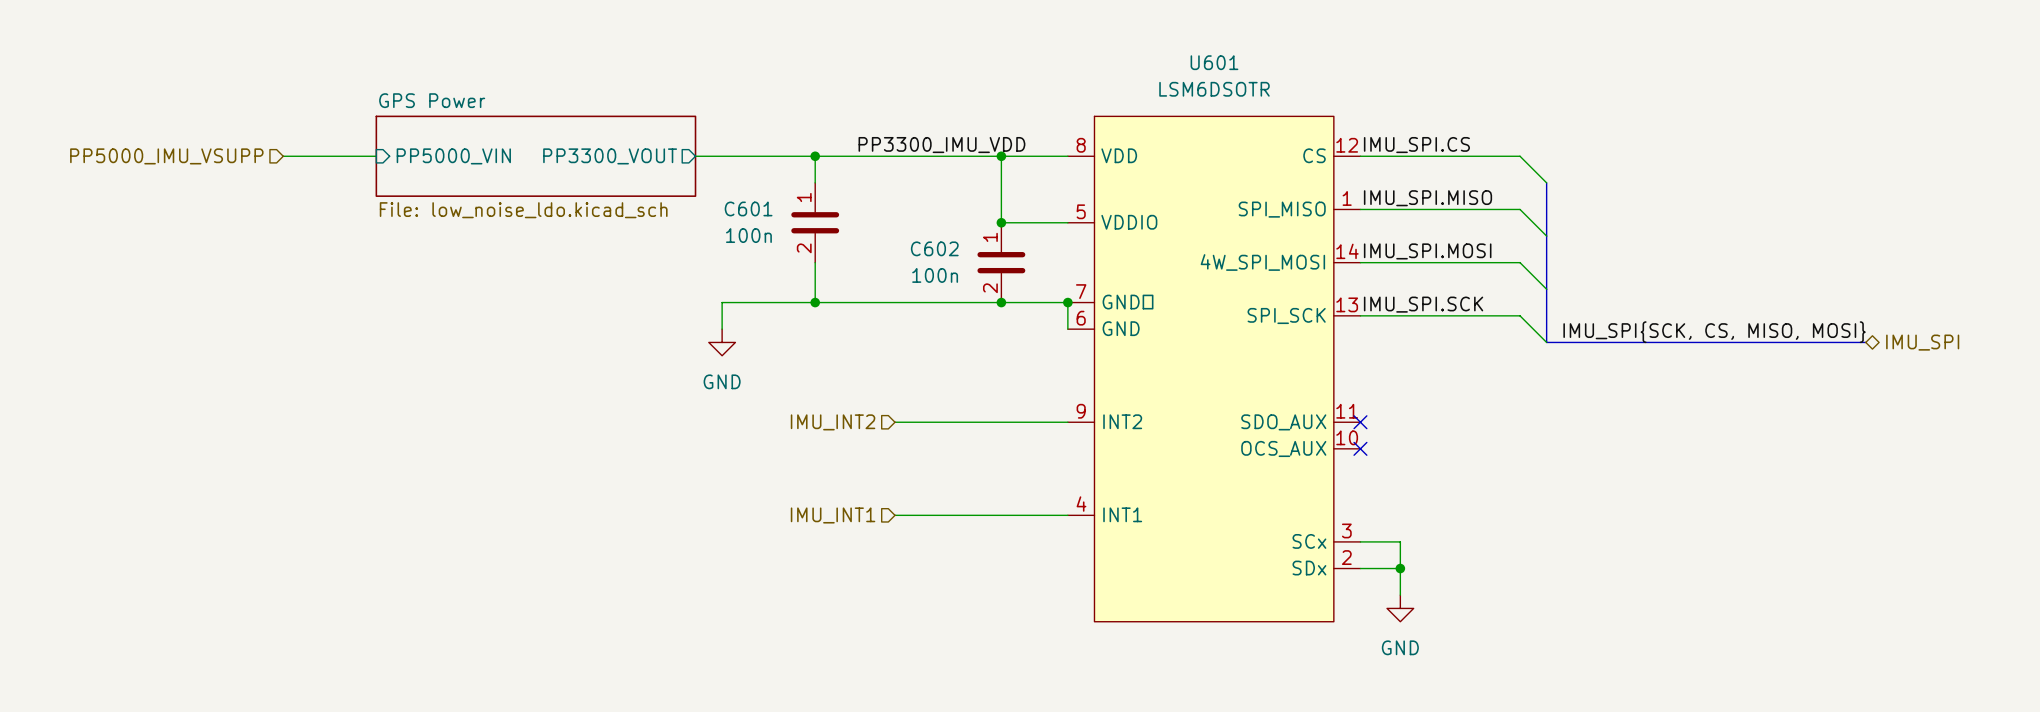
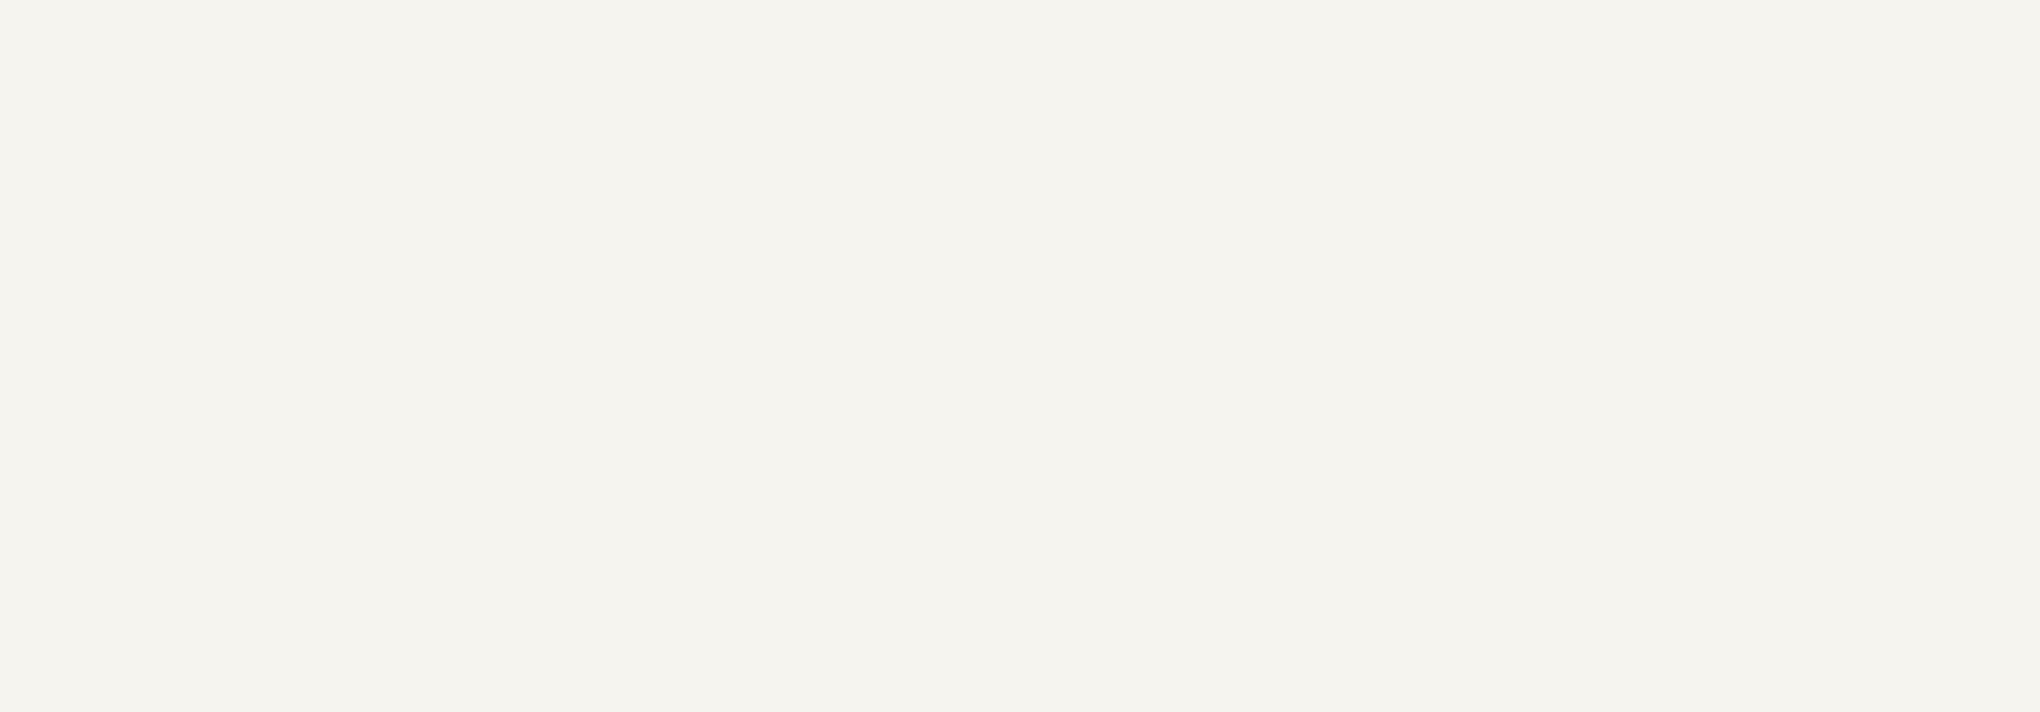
label: PP3300_IMU_VDD (941, 145) -> none
label: IMU_SPI.CS (1416, 145) -> none
hierarchical label: PP5000_IMU_VSUPP (166, 156) -> none
wire: (283, 156) (376, 156) -> none
sheet pin: PP5000_VIN (453, 156) -> none
sheet GPS Power: File: low_noise_ldo.kicad_sch (535, 156) -> none
sheet pin: PP3300_VOUT (610, 156) -> none
wire: (695, 156) (1067, 156) -> none
wire: (815, 156) (815, 182) -> none
junction: (815, 156) -> none
wire: (1001, 156) (1001, 222) (1067, 222) -> none
junction: (1001, 156) -> none
wire: (1360, 156) (1520, 156) (1546, 182) -> none
bus: (1546, 182) (1546, 342) (1865, 342) -> none
label: IMU_SPI.MISO (1427, 198) -> none
wire: (1360, 209) (1520, 209) (1546, 236) -> none
C601: 100n (815, 222) -> none
junction: (1001, 222) -> none
label: IMU_SPI.MOSI (1427, 251) -> none
wire: (815, 262) (815, 302) -> none
C602: 100n (1001, 262) -> none
wire: (1360, 262) (1520, 262) (1546, 289) -> none
junction: (815, 302) -> none
junction: (1001, 302) -> none
junction: (1067, 302) -> none
label: IMU_SPI.SCK (1423, 304) -> none
wire: (1360, 315) (1520, 315) (1546, 342) -> none
wire: (722, 329) (722, 302) (1067, 302) (1067, 329) -> none
label: IMU_SPI{SCK, CS, MISO, MOSI} (1714, 332) -> none
power symbol: GND (722, 342) -> none
hierarchical label: IMU_SPI (1922, 342) -> none
U601: LSM6DSOTR (1214, 369) -> none
hierarchical label: IMU_INT2 (833, 422) -> none
wire: (894, 422) (1067, 422) -> none
no-connect mark: (1360, 422) -> none
no-connect mark: (1360, 448) -> none
hierarchical label: IMU_INT1 (833, 515) -> none
wire: (894, 515) (1067, 515) -> none
wire: (1360, 541) (1400, 541) (1400, 595) -> none
wire: (1360, 568) (1400, 568) -> none
junction: (1400, 568) -> none
power symbol: GND (1400, 608) -> none

